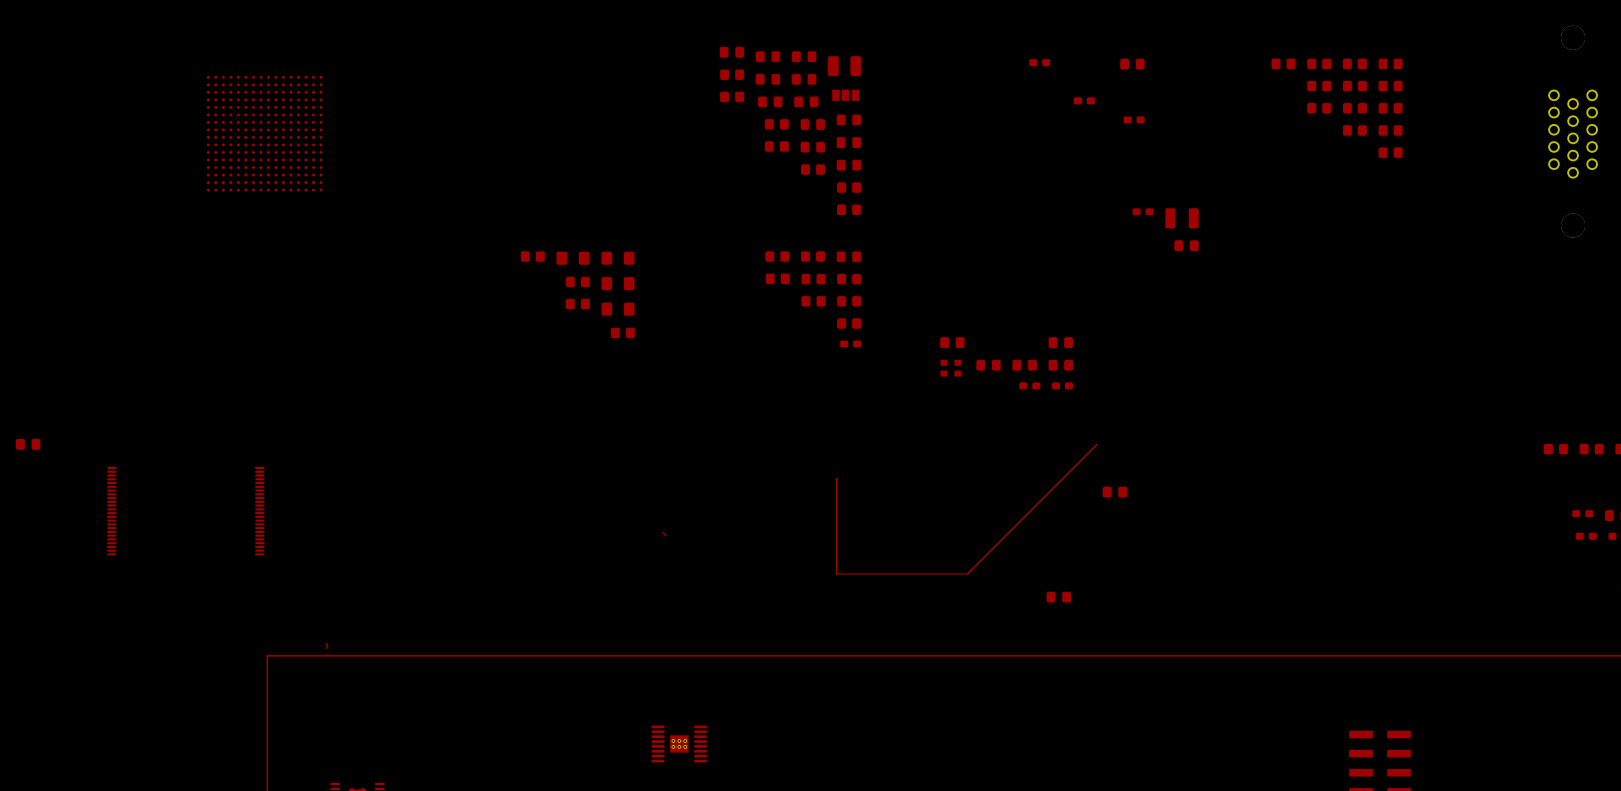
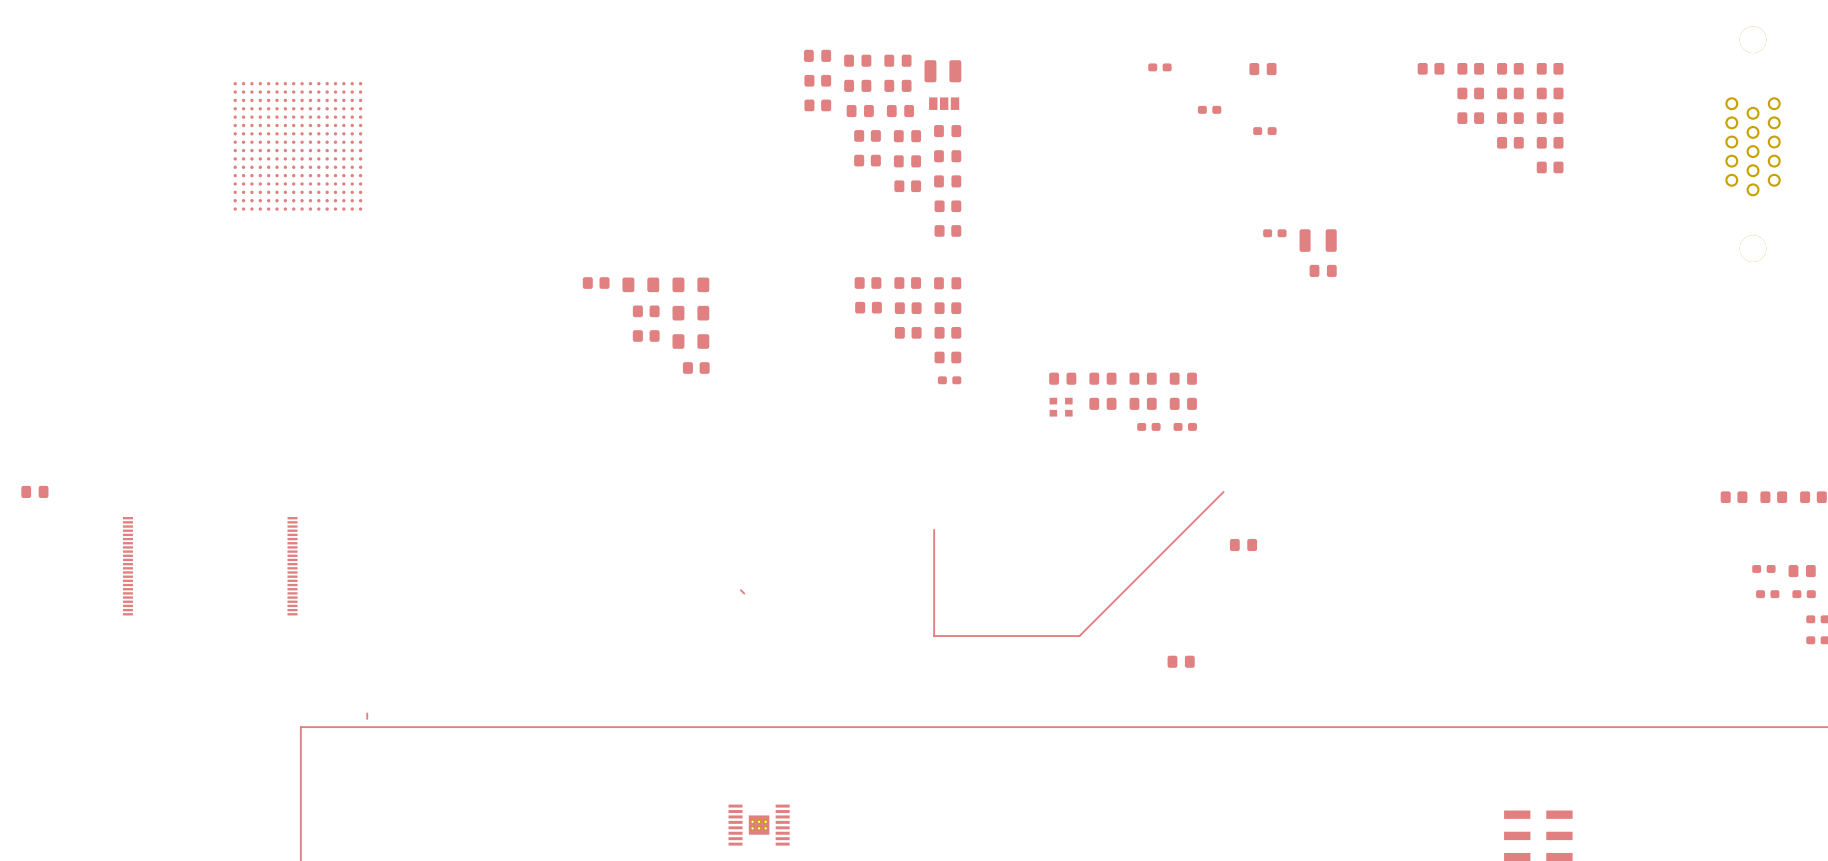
part: none -> (1102, 378)
part: none -> (1143, 378)

